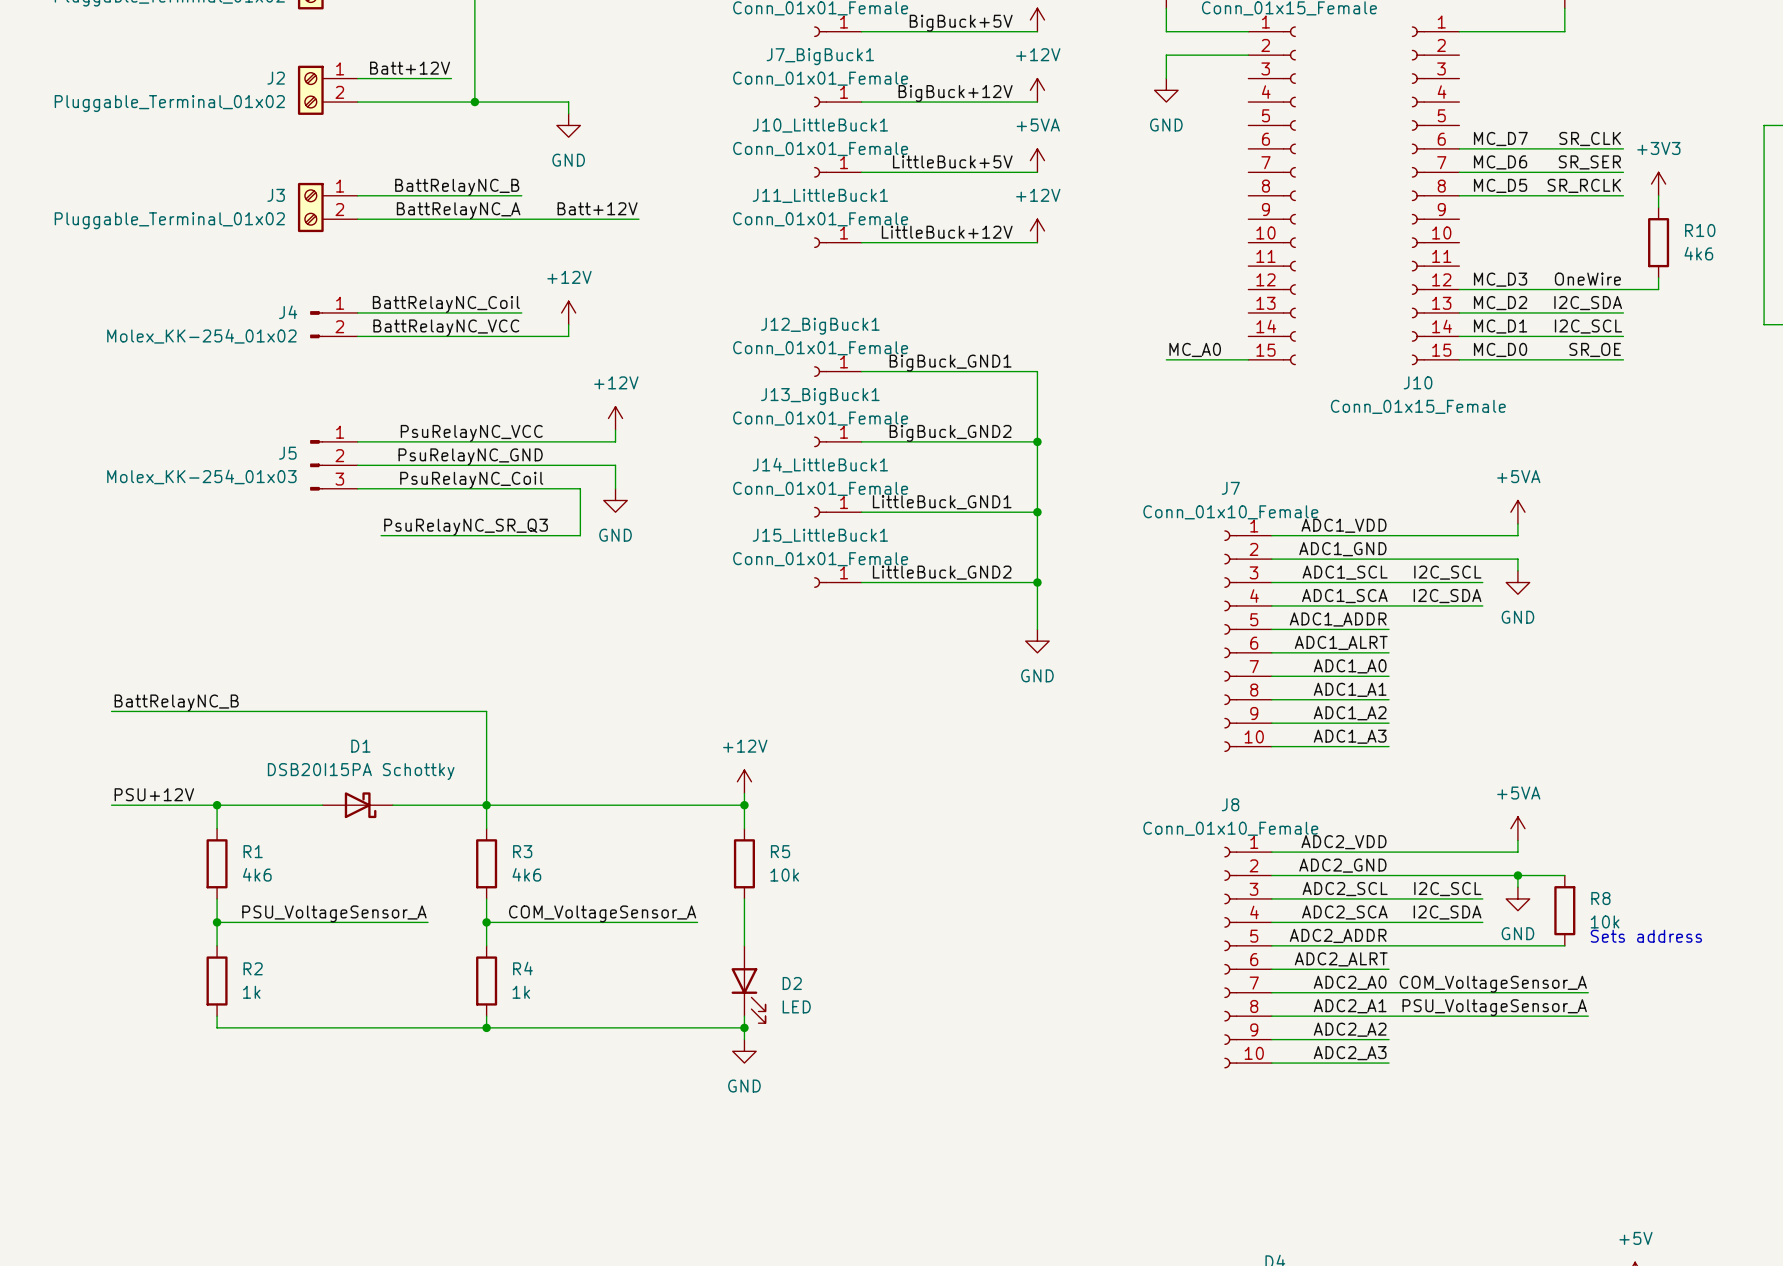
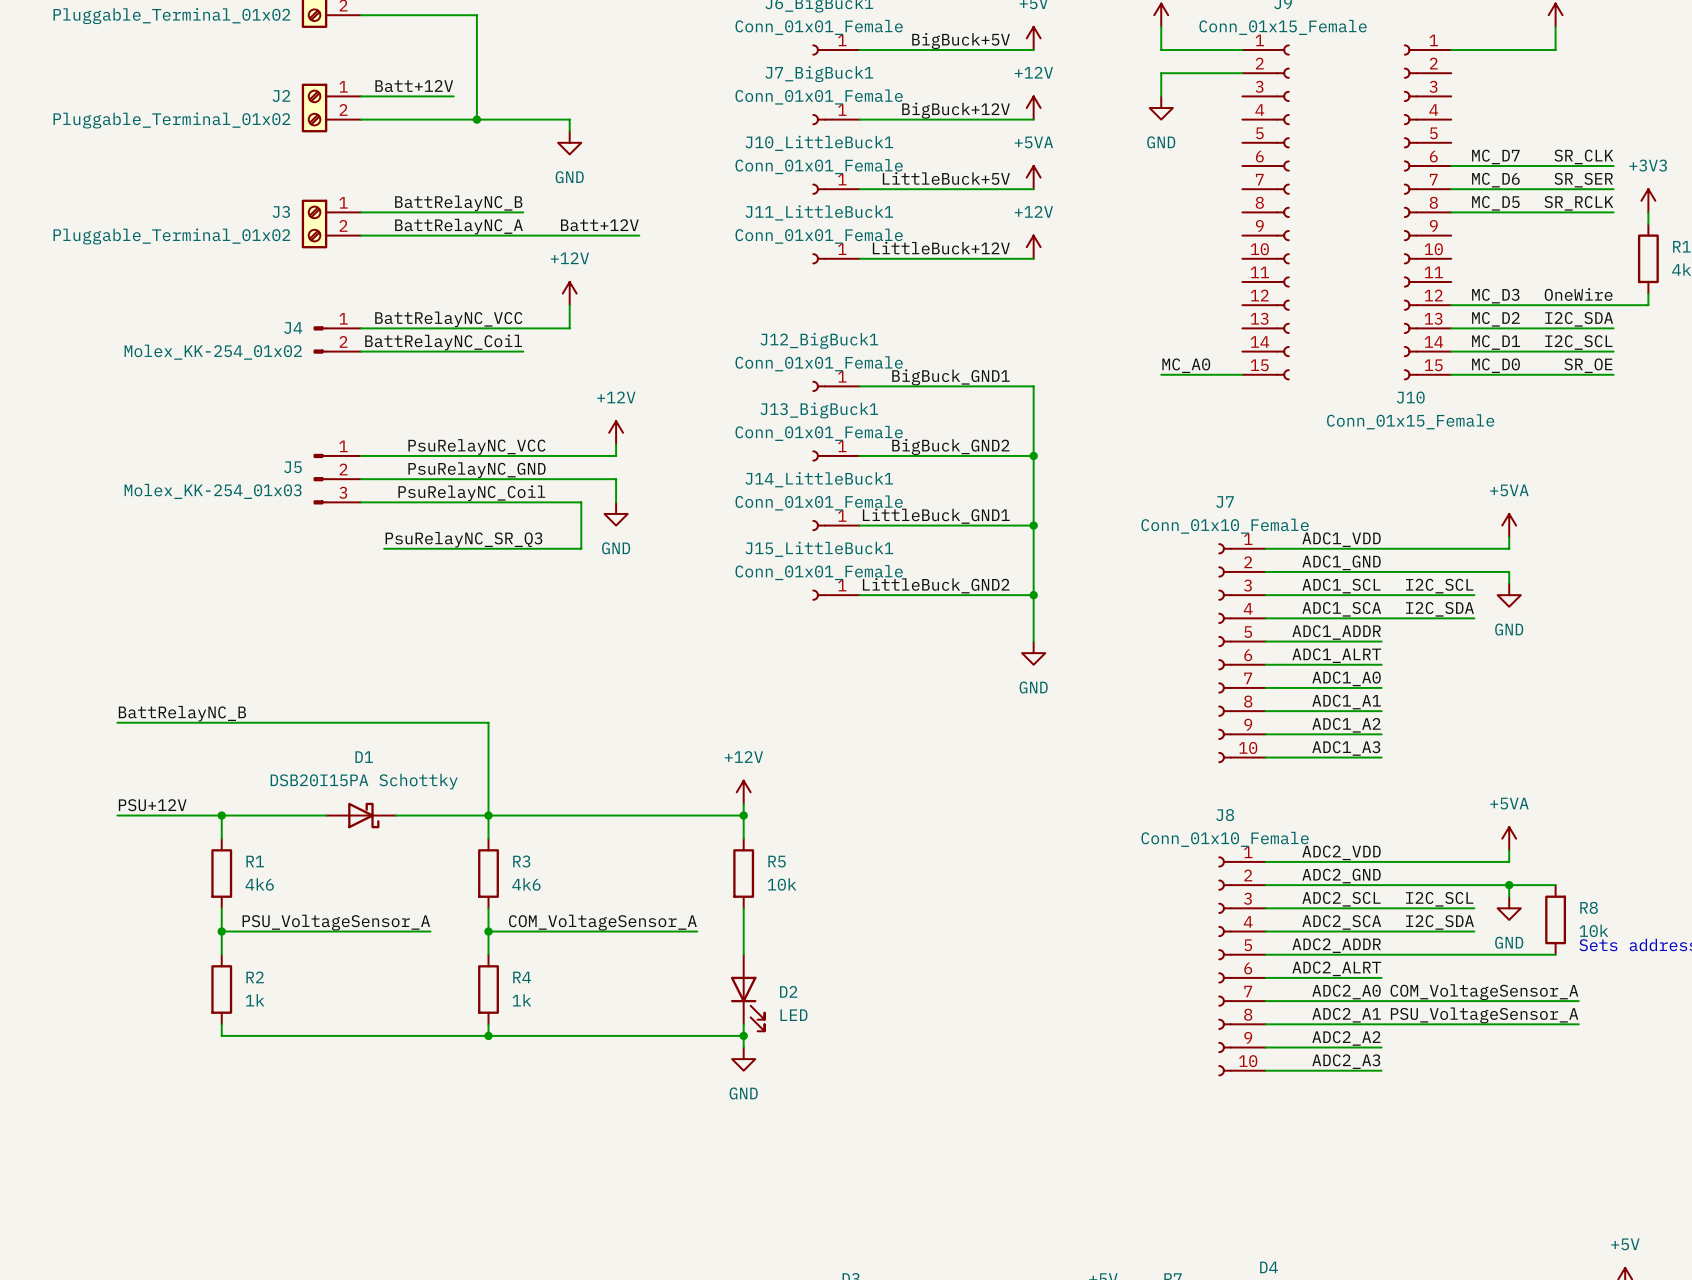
wire: none -> (569, 305) (569, 328) (523, 328)
label: BattRelayNC_Coil (446, 304) -> BattRelayNC_VCC (448, 319)
power symbol position: +12V (568, 312) -> +12V (569, 293)
wire: (568, 324) (568, 336) (521, 336) -> none
label: BattRelayNC_VCC (446, 327) -> BattRelayNC_Coil (443, 342)

